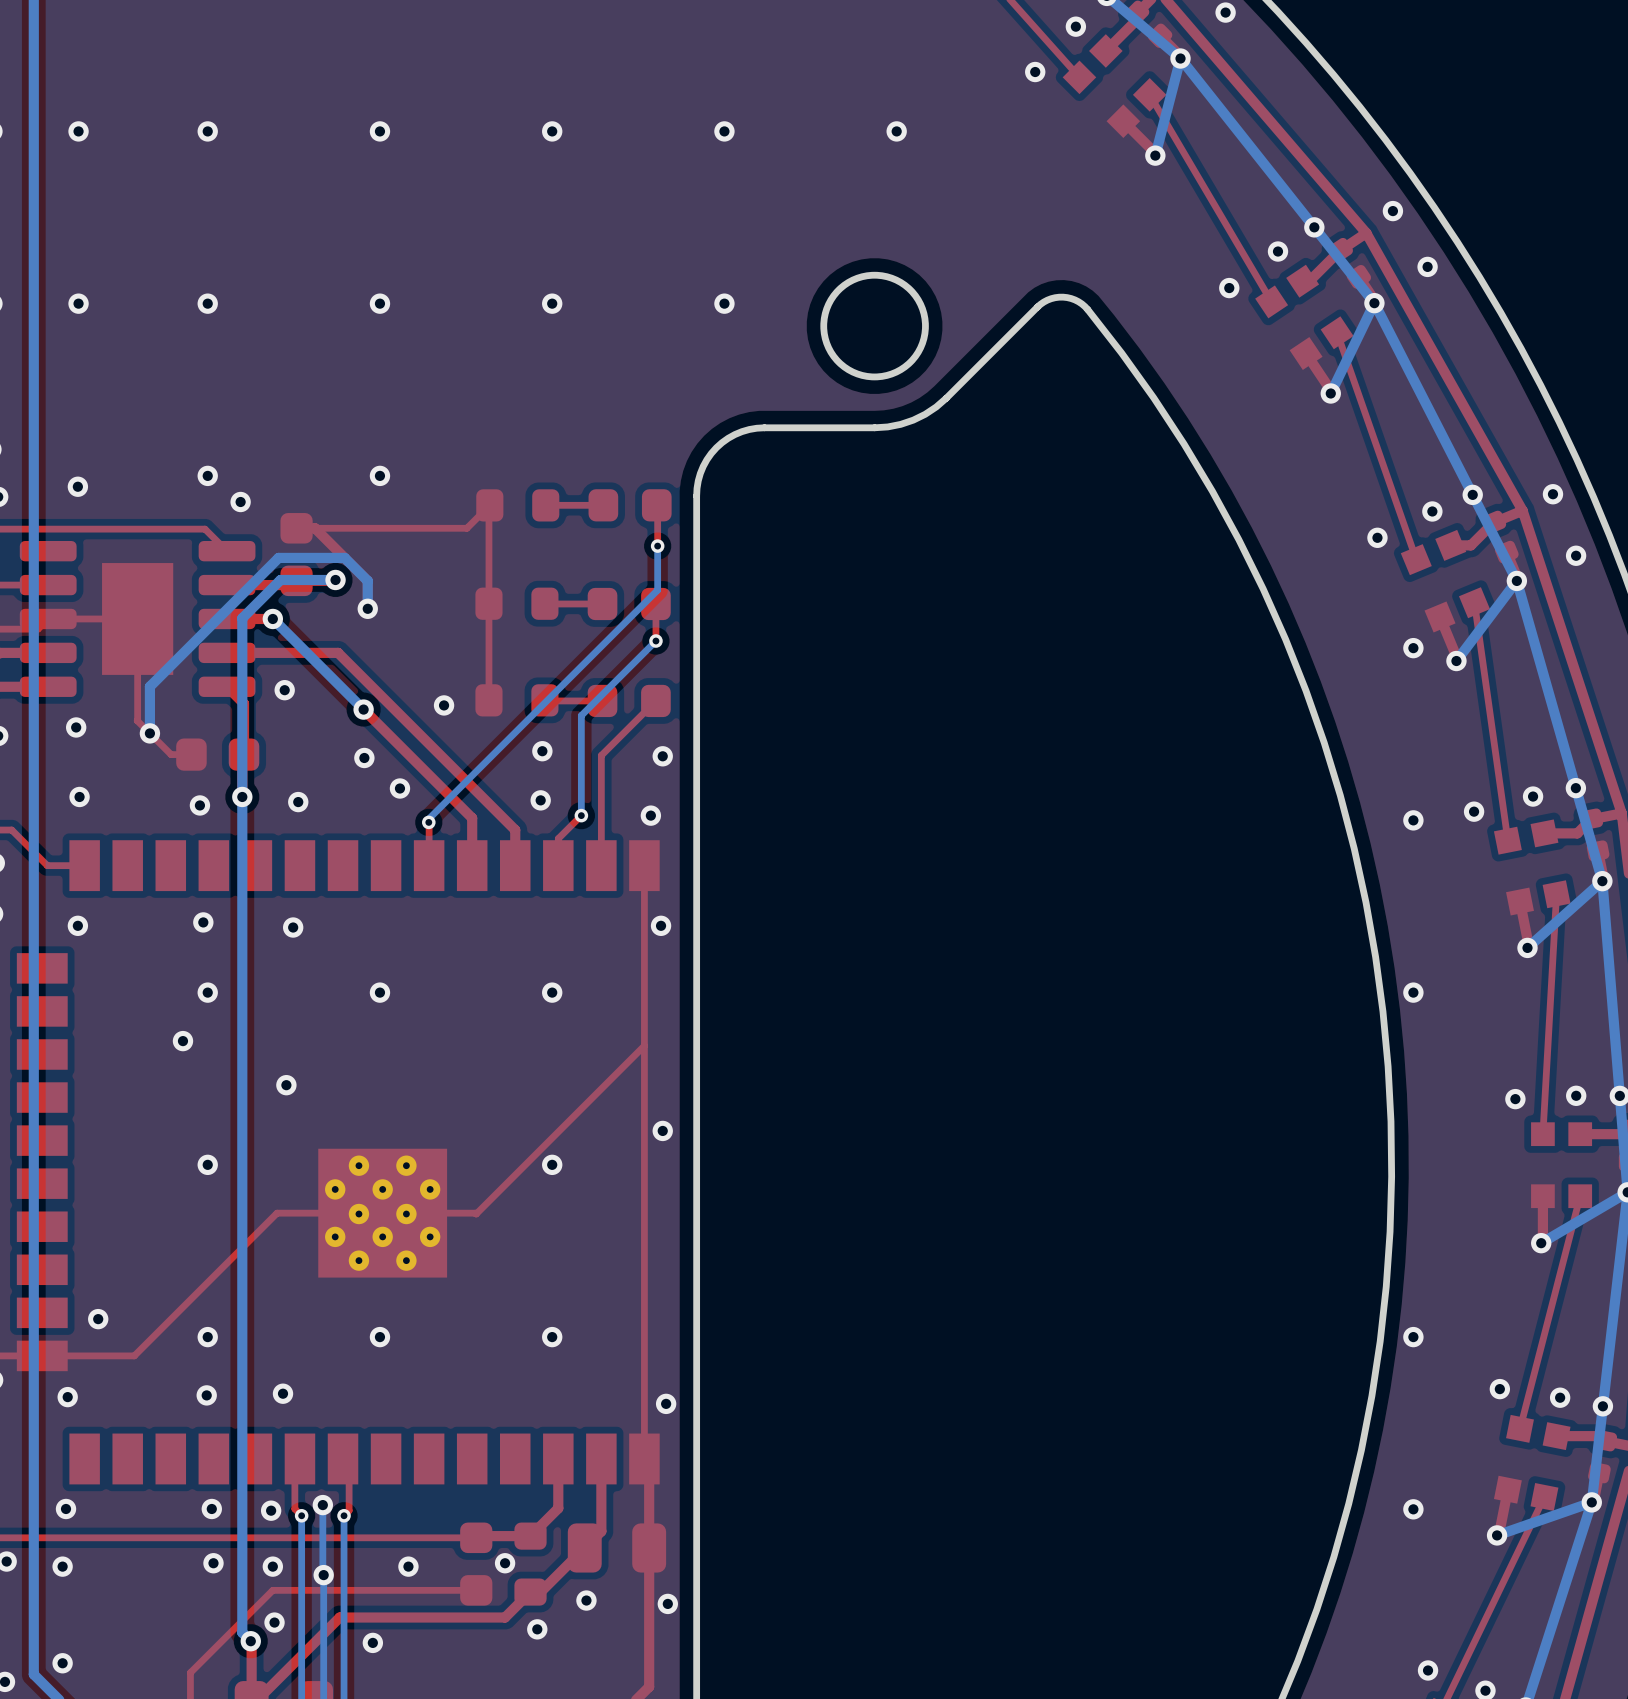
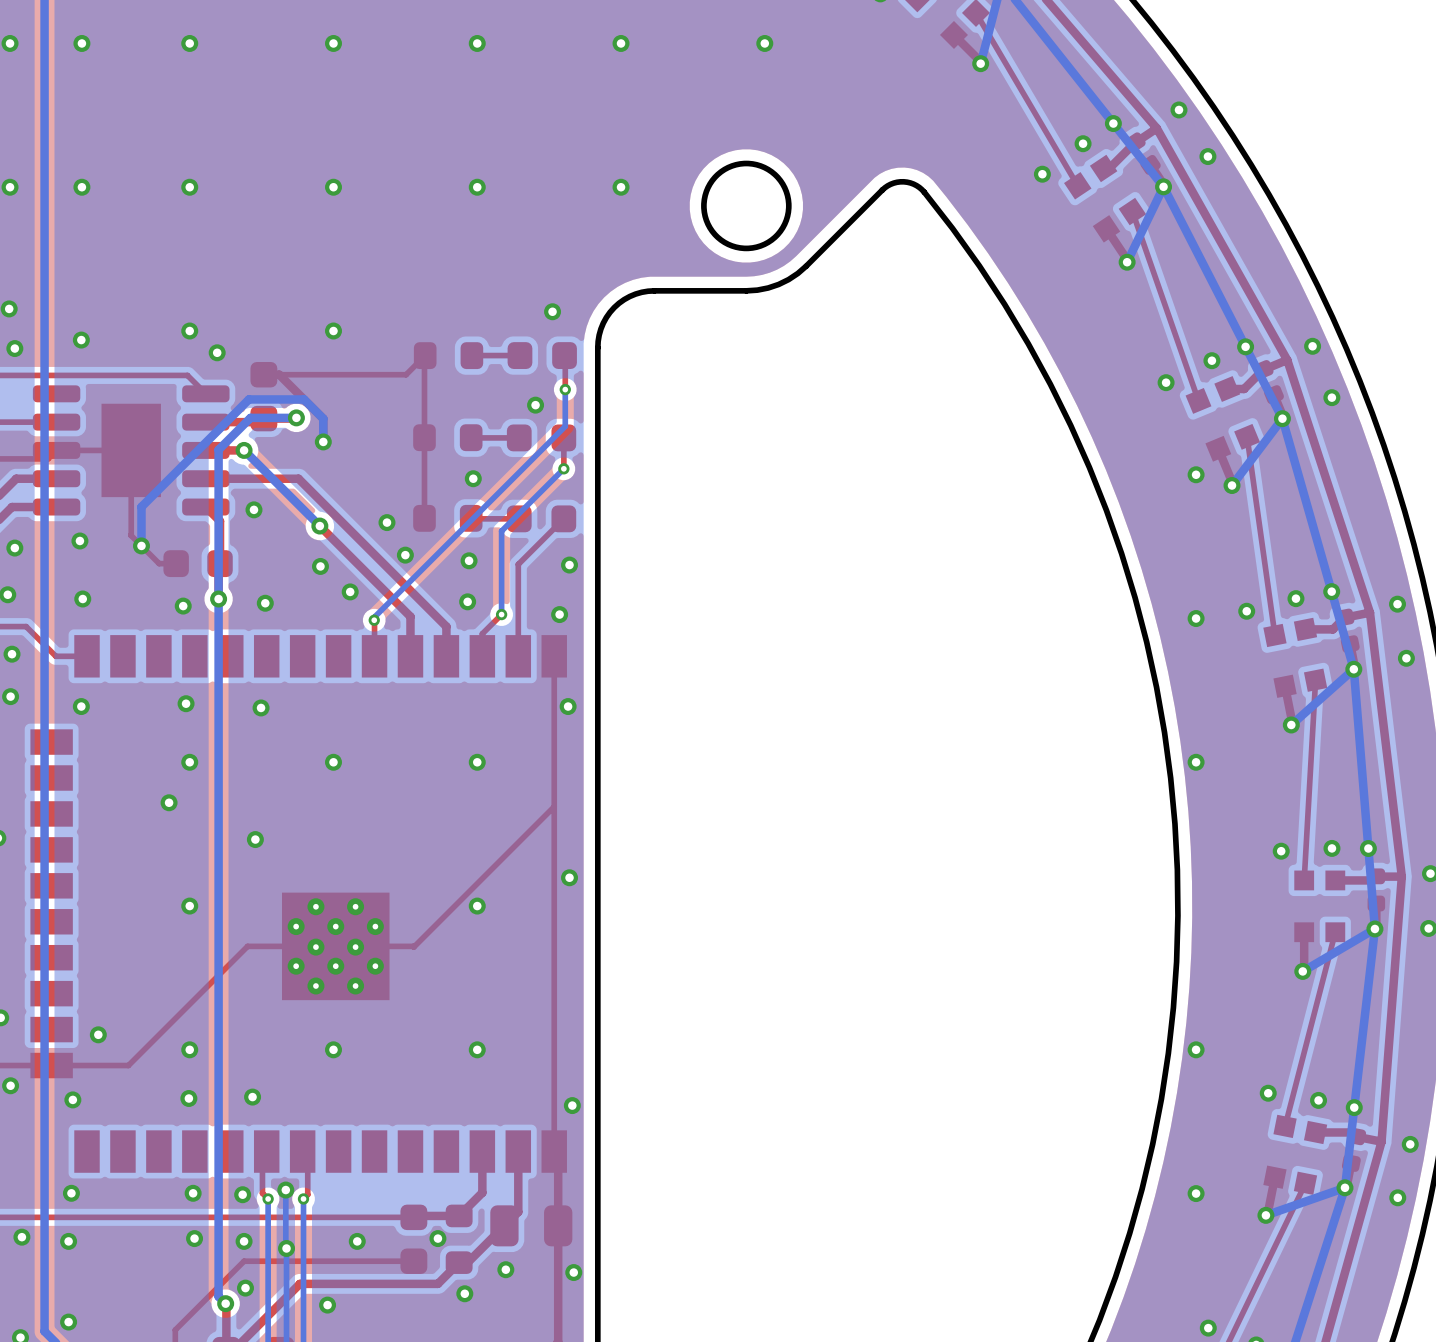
via: none -> (552, 311)
via: none -> (535, 405)
via: none -> (473, 478)
via: none -> (405, 555)

